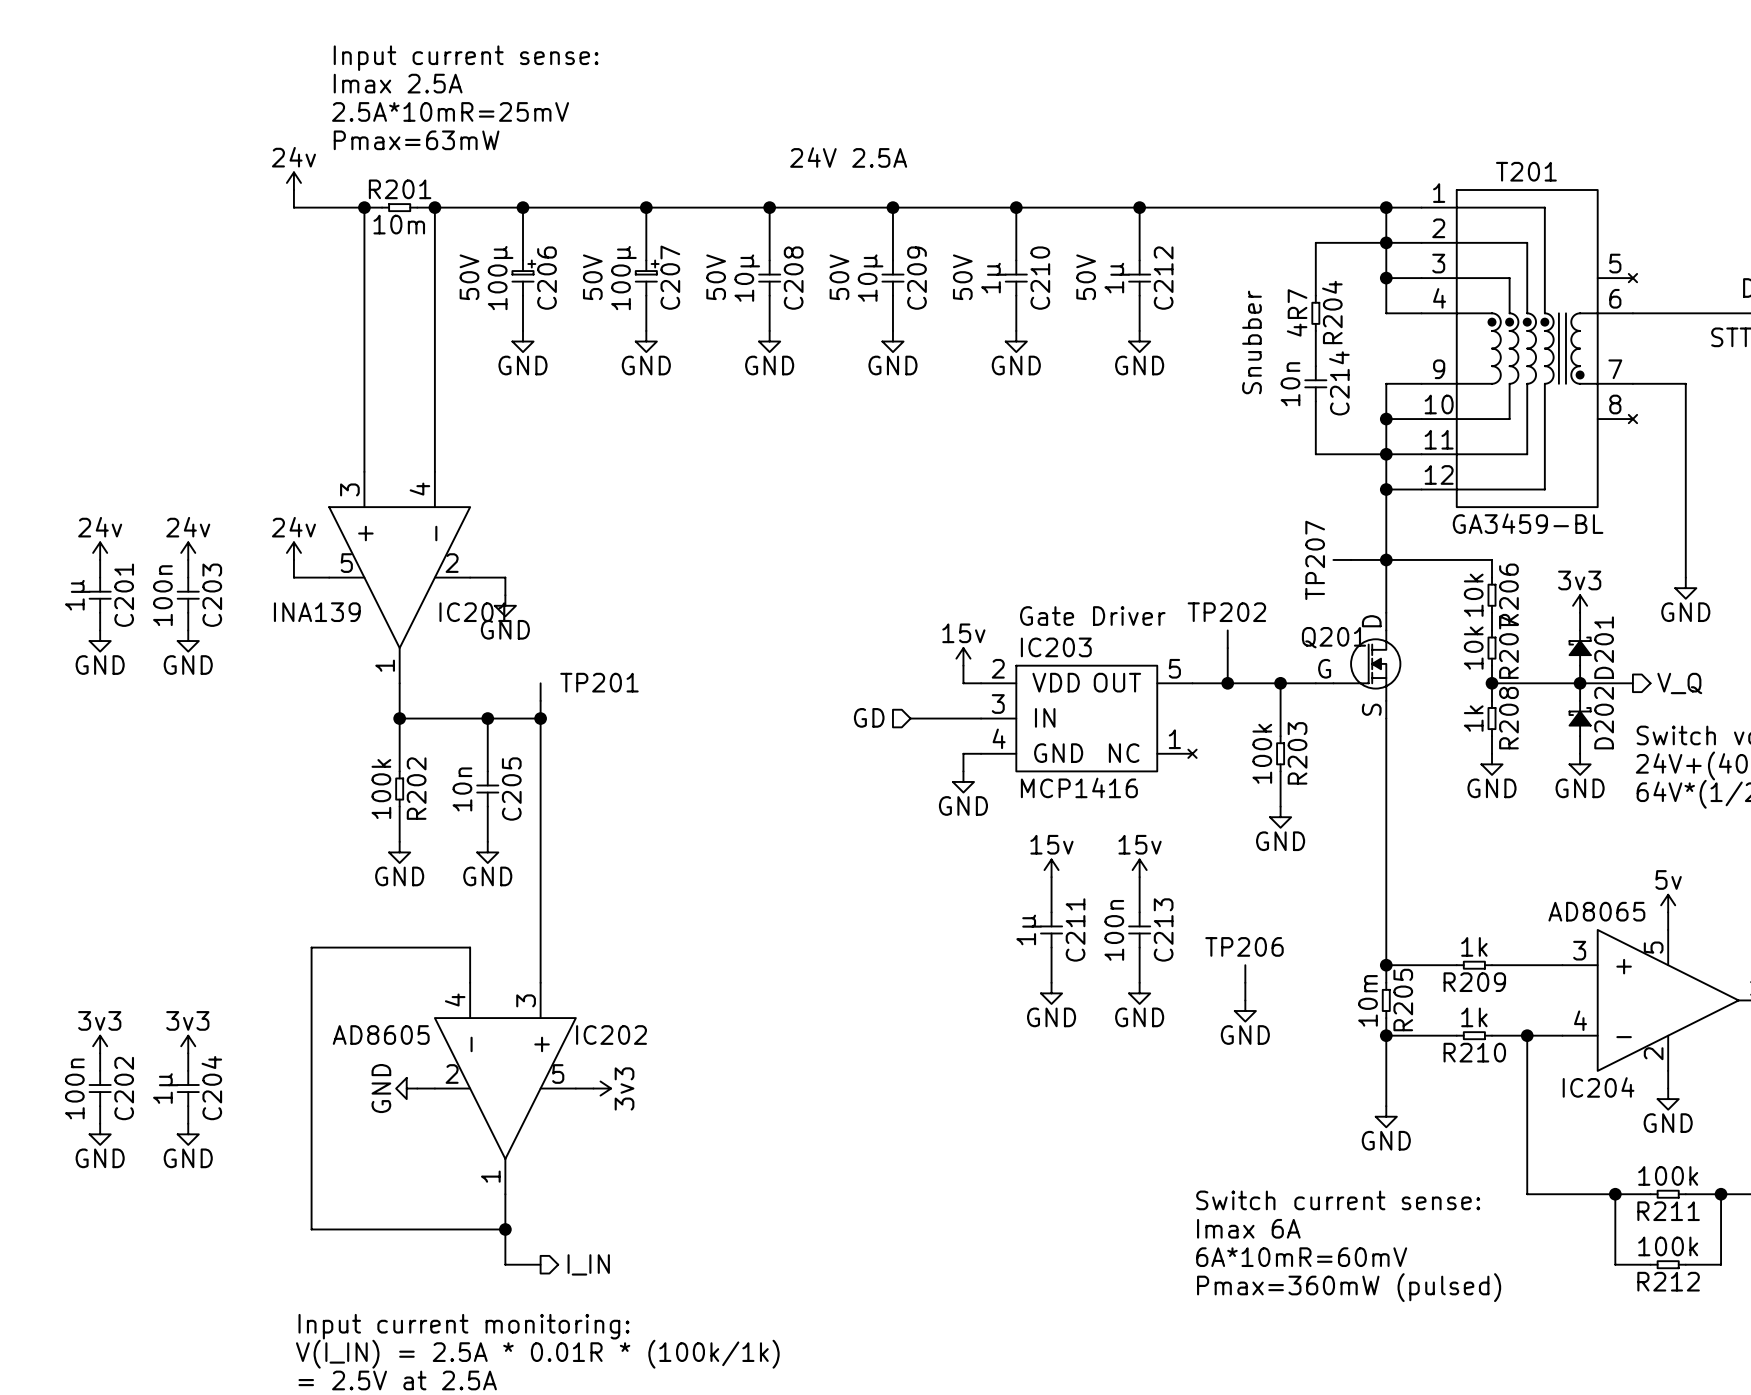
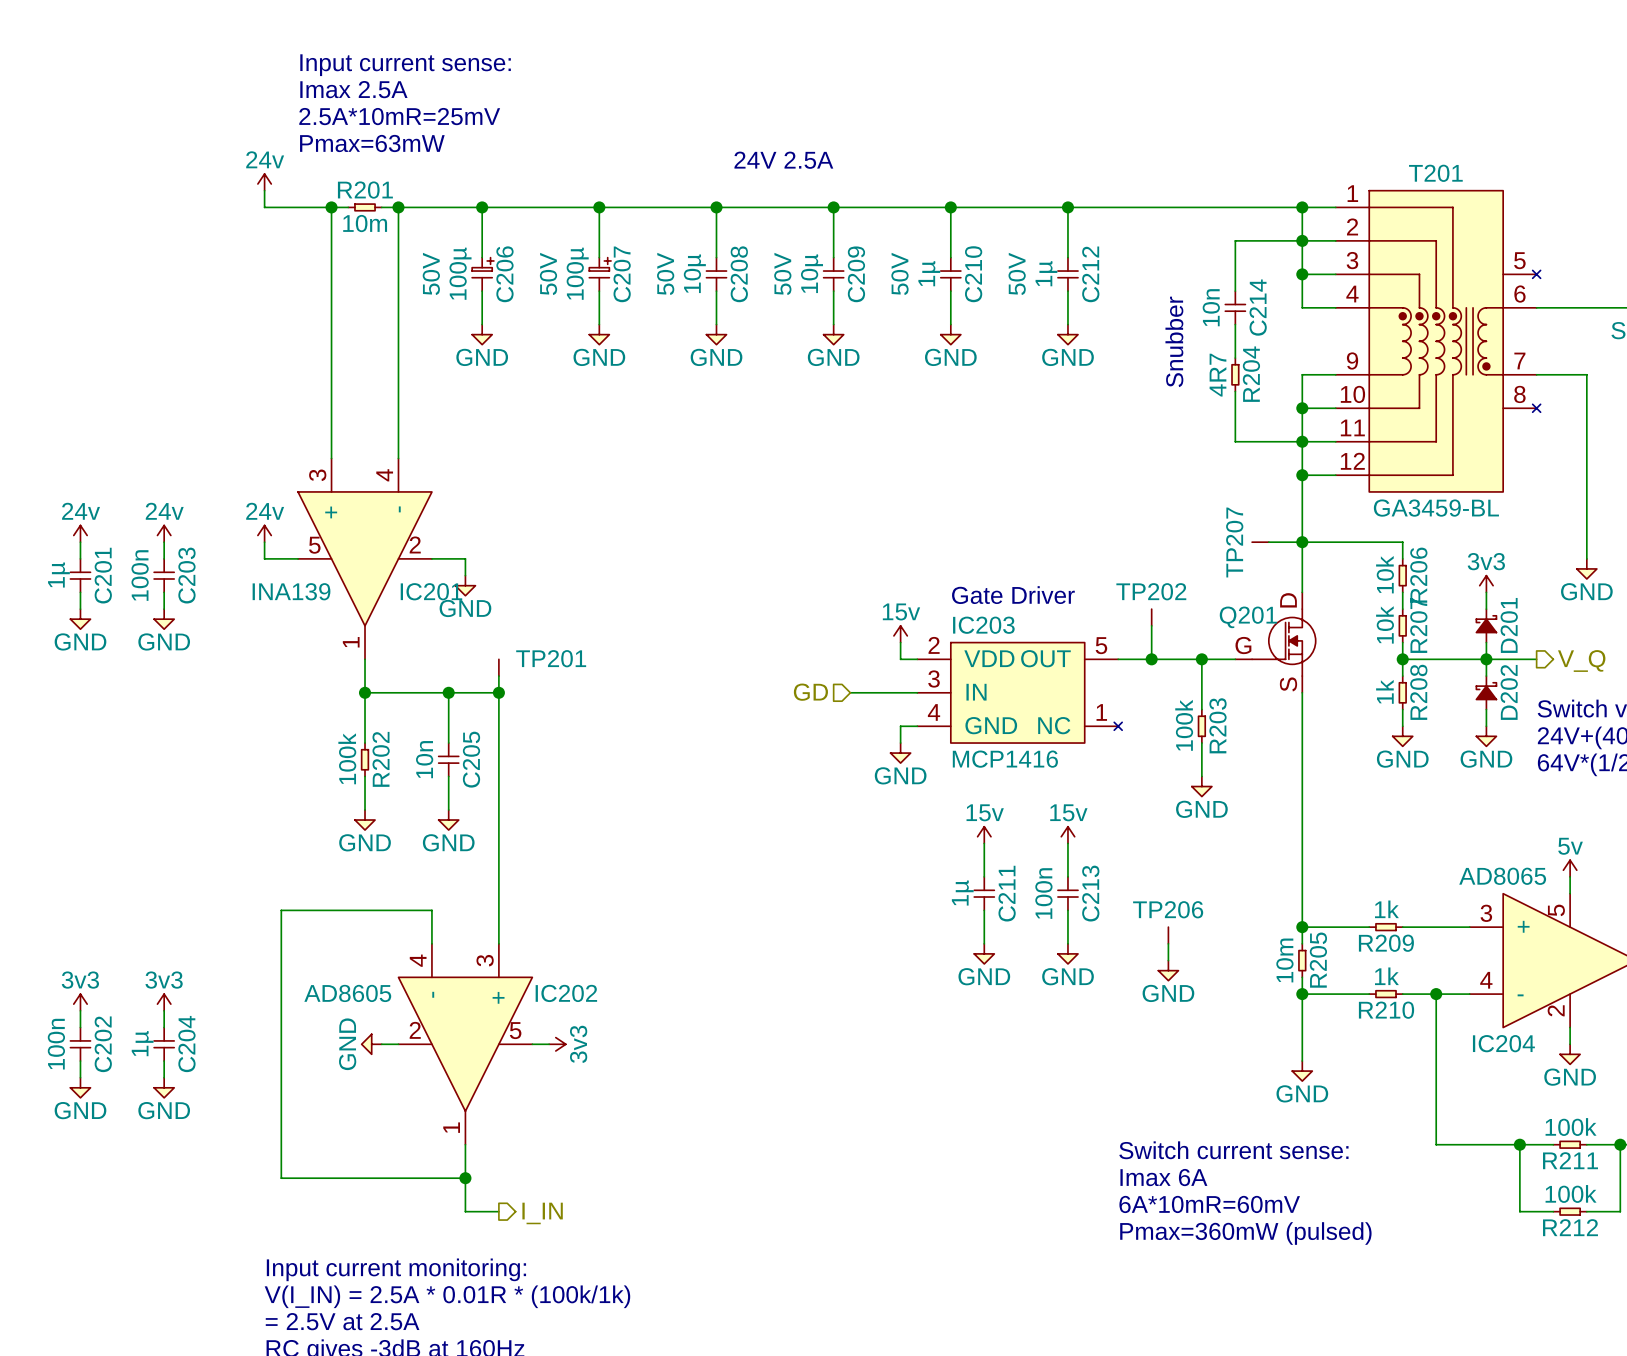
R204 position: (1315, 313) -> (1235, 374)
C214 position: (1315, 383) -> (1235, 307)

